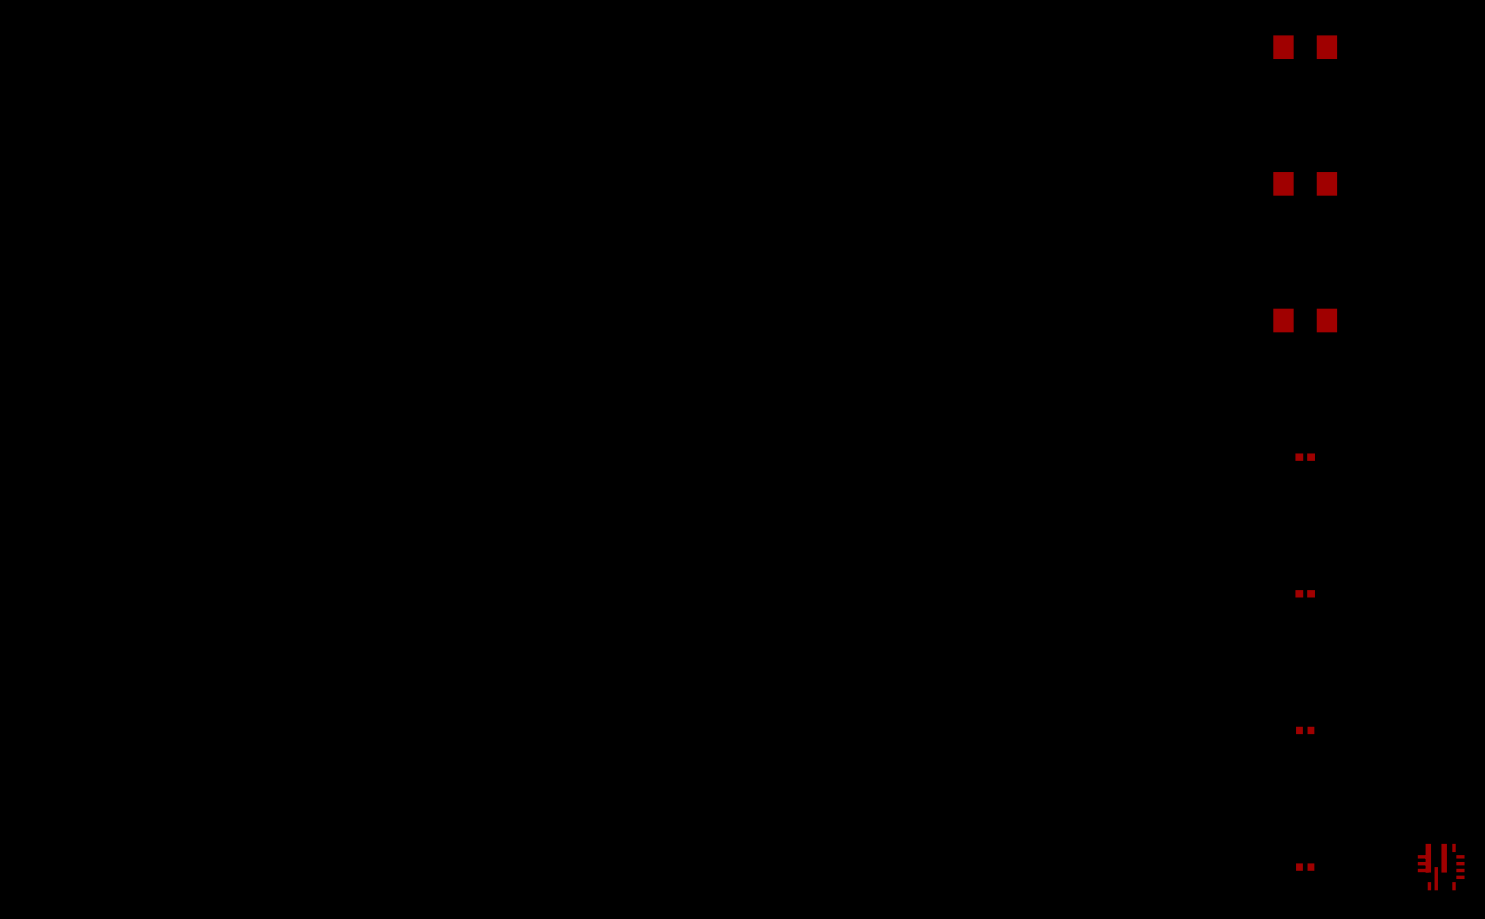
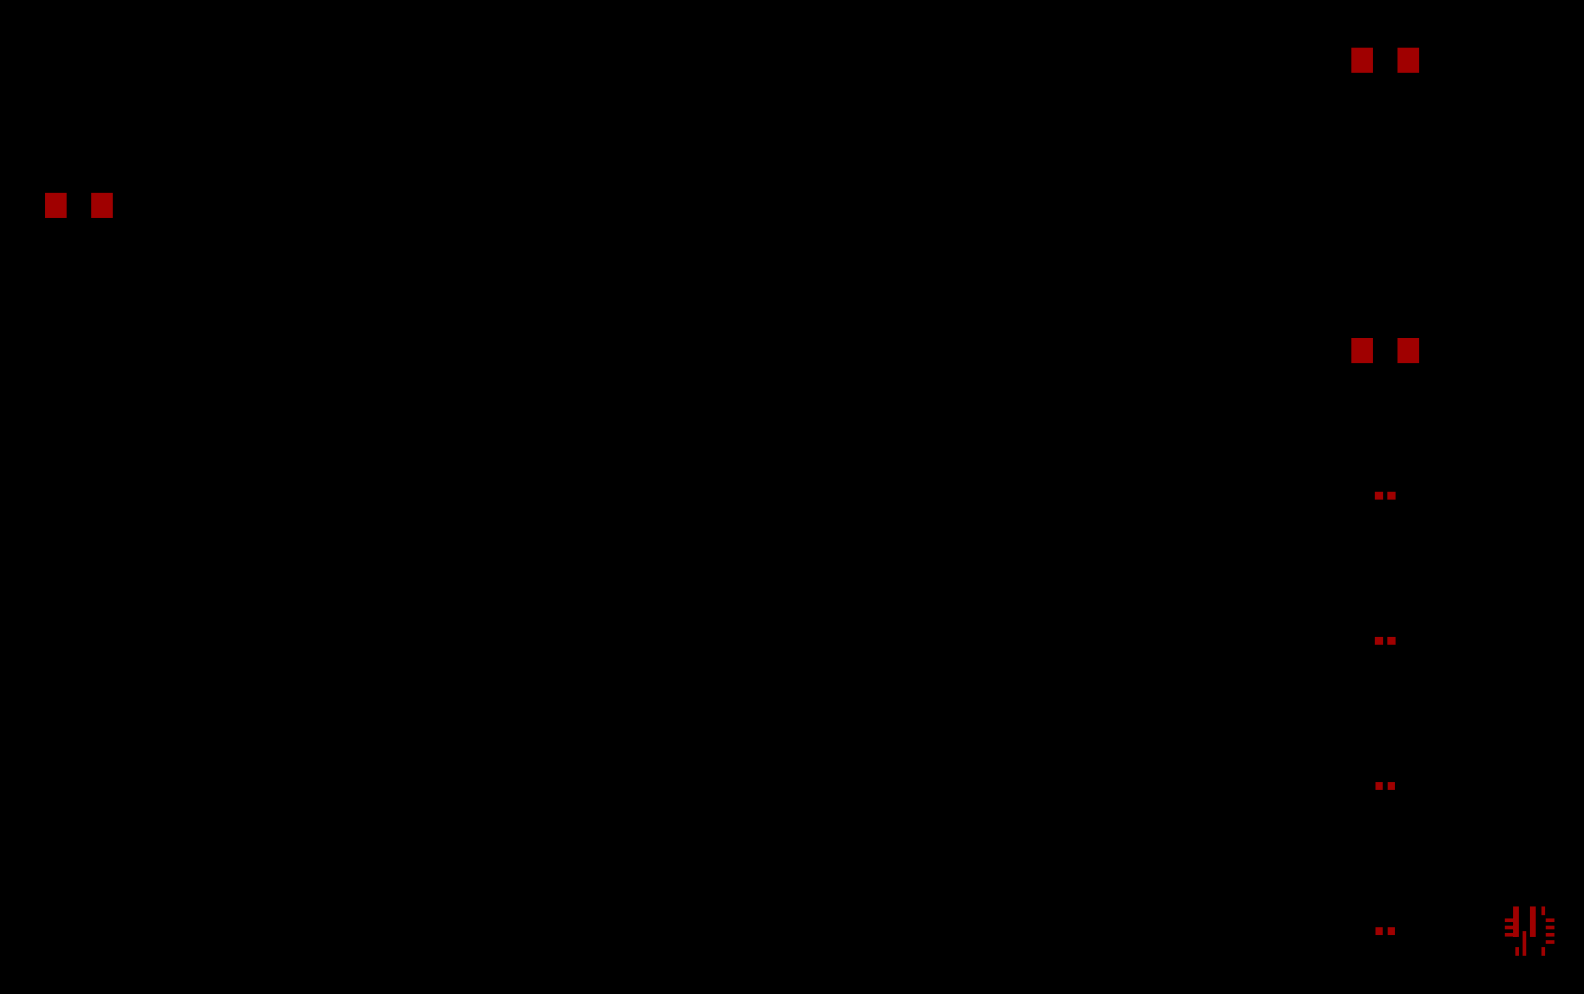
part: none -> (78, 205)
part: (1305, 183) -> none

